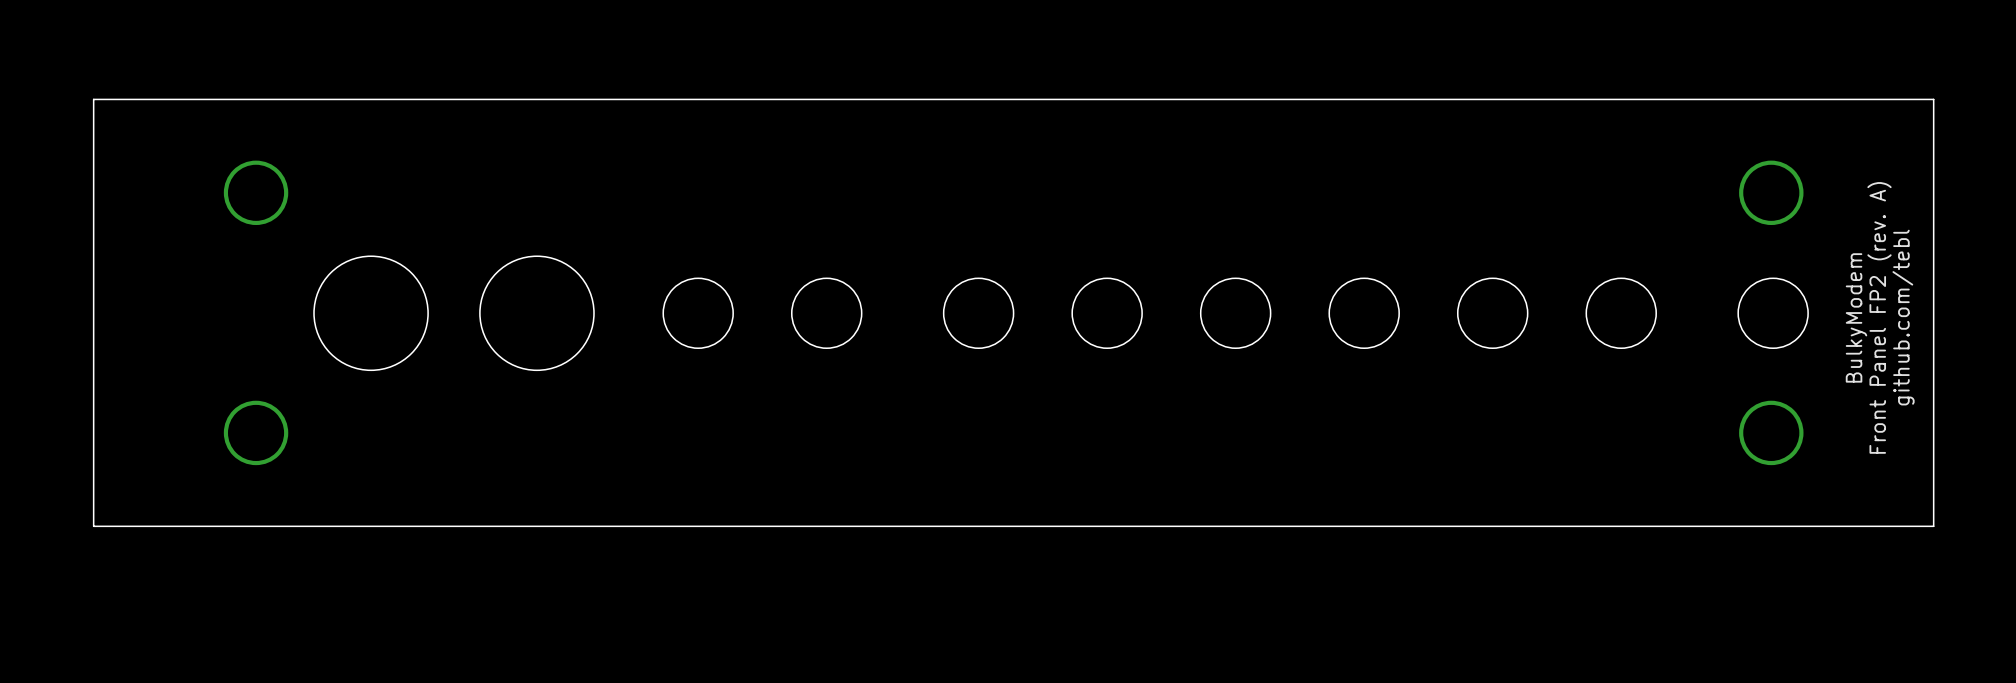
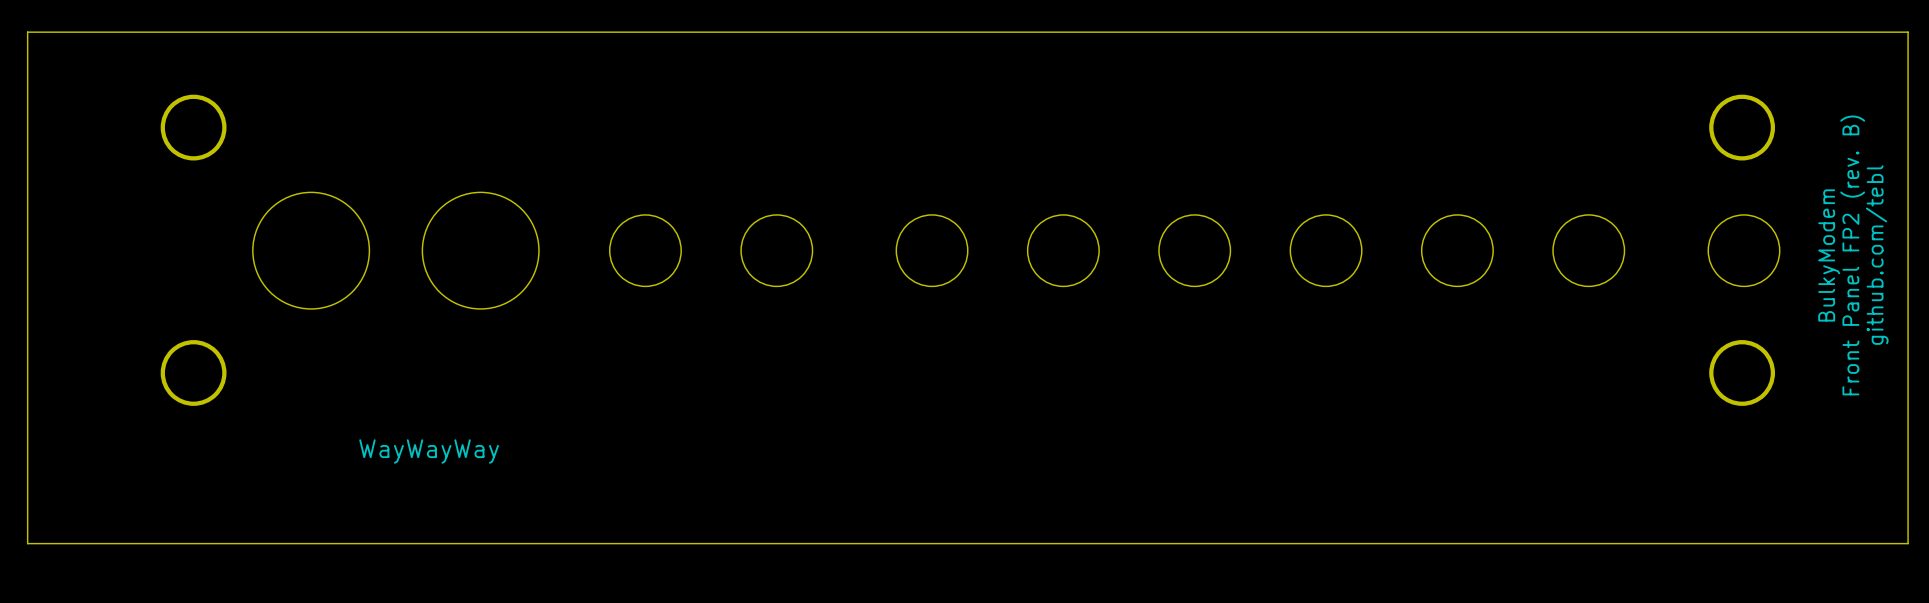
text: Front Panel FP2 (rev. A) (1879, 317) -> Front Panel FP2 (rev. B) (1852, 255)
text: none -> WayWayWay (429, 451)
board edge: (1933, 526) (93, 526) -> (1908, 468) (1908, 543) (27, 543) (27, 468)

